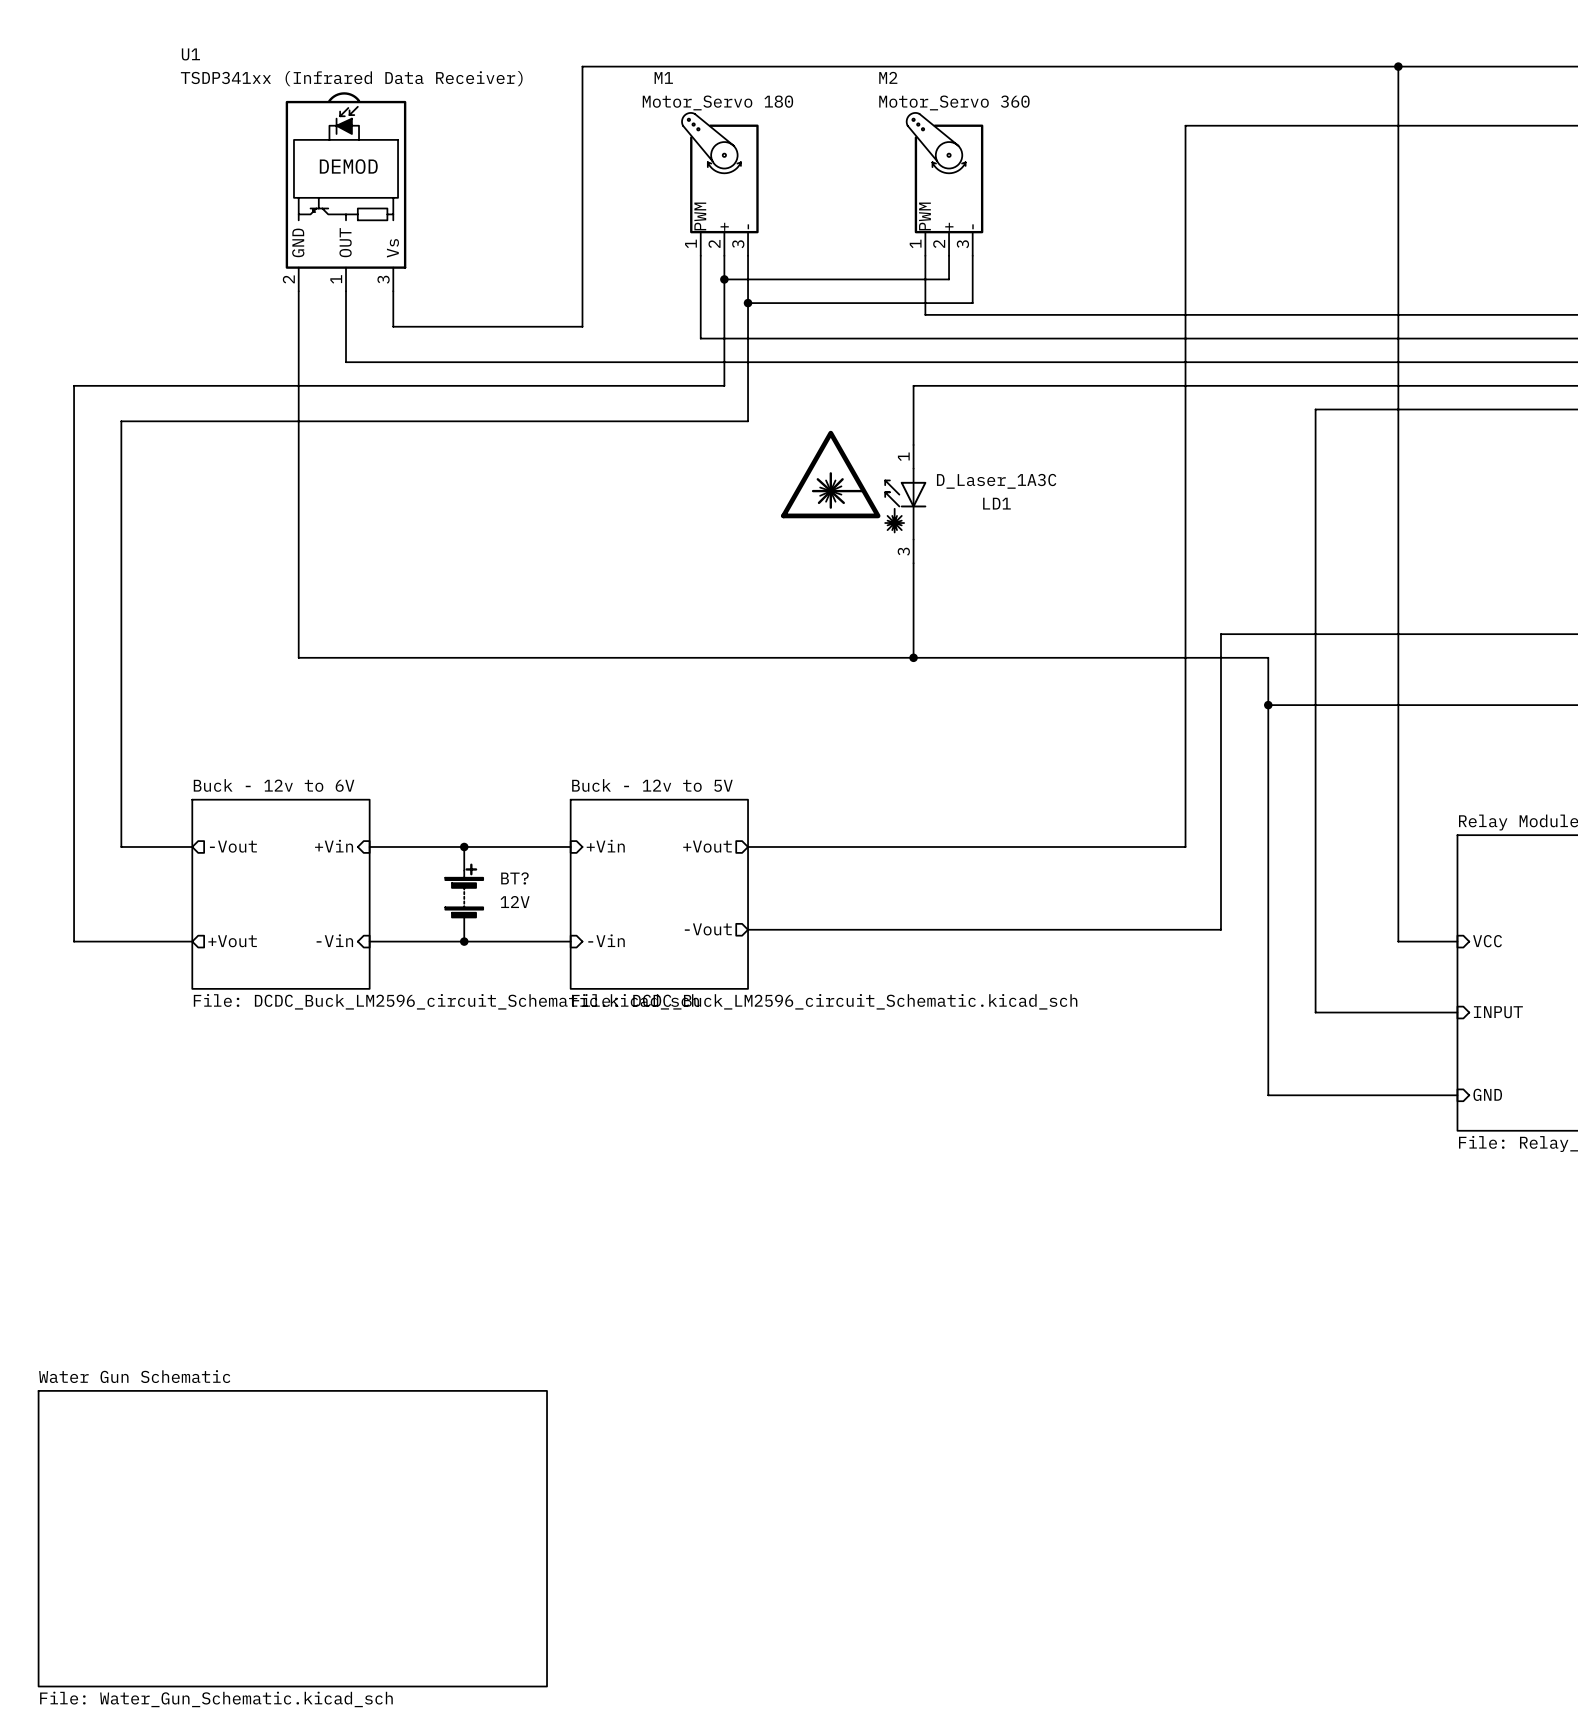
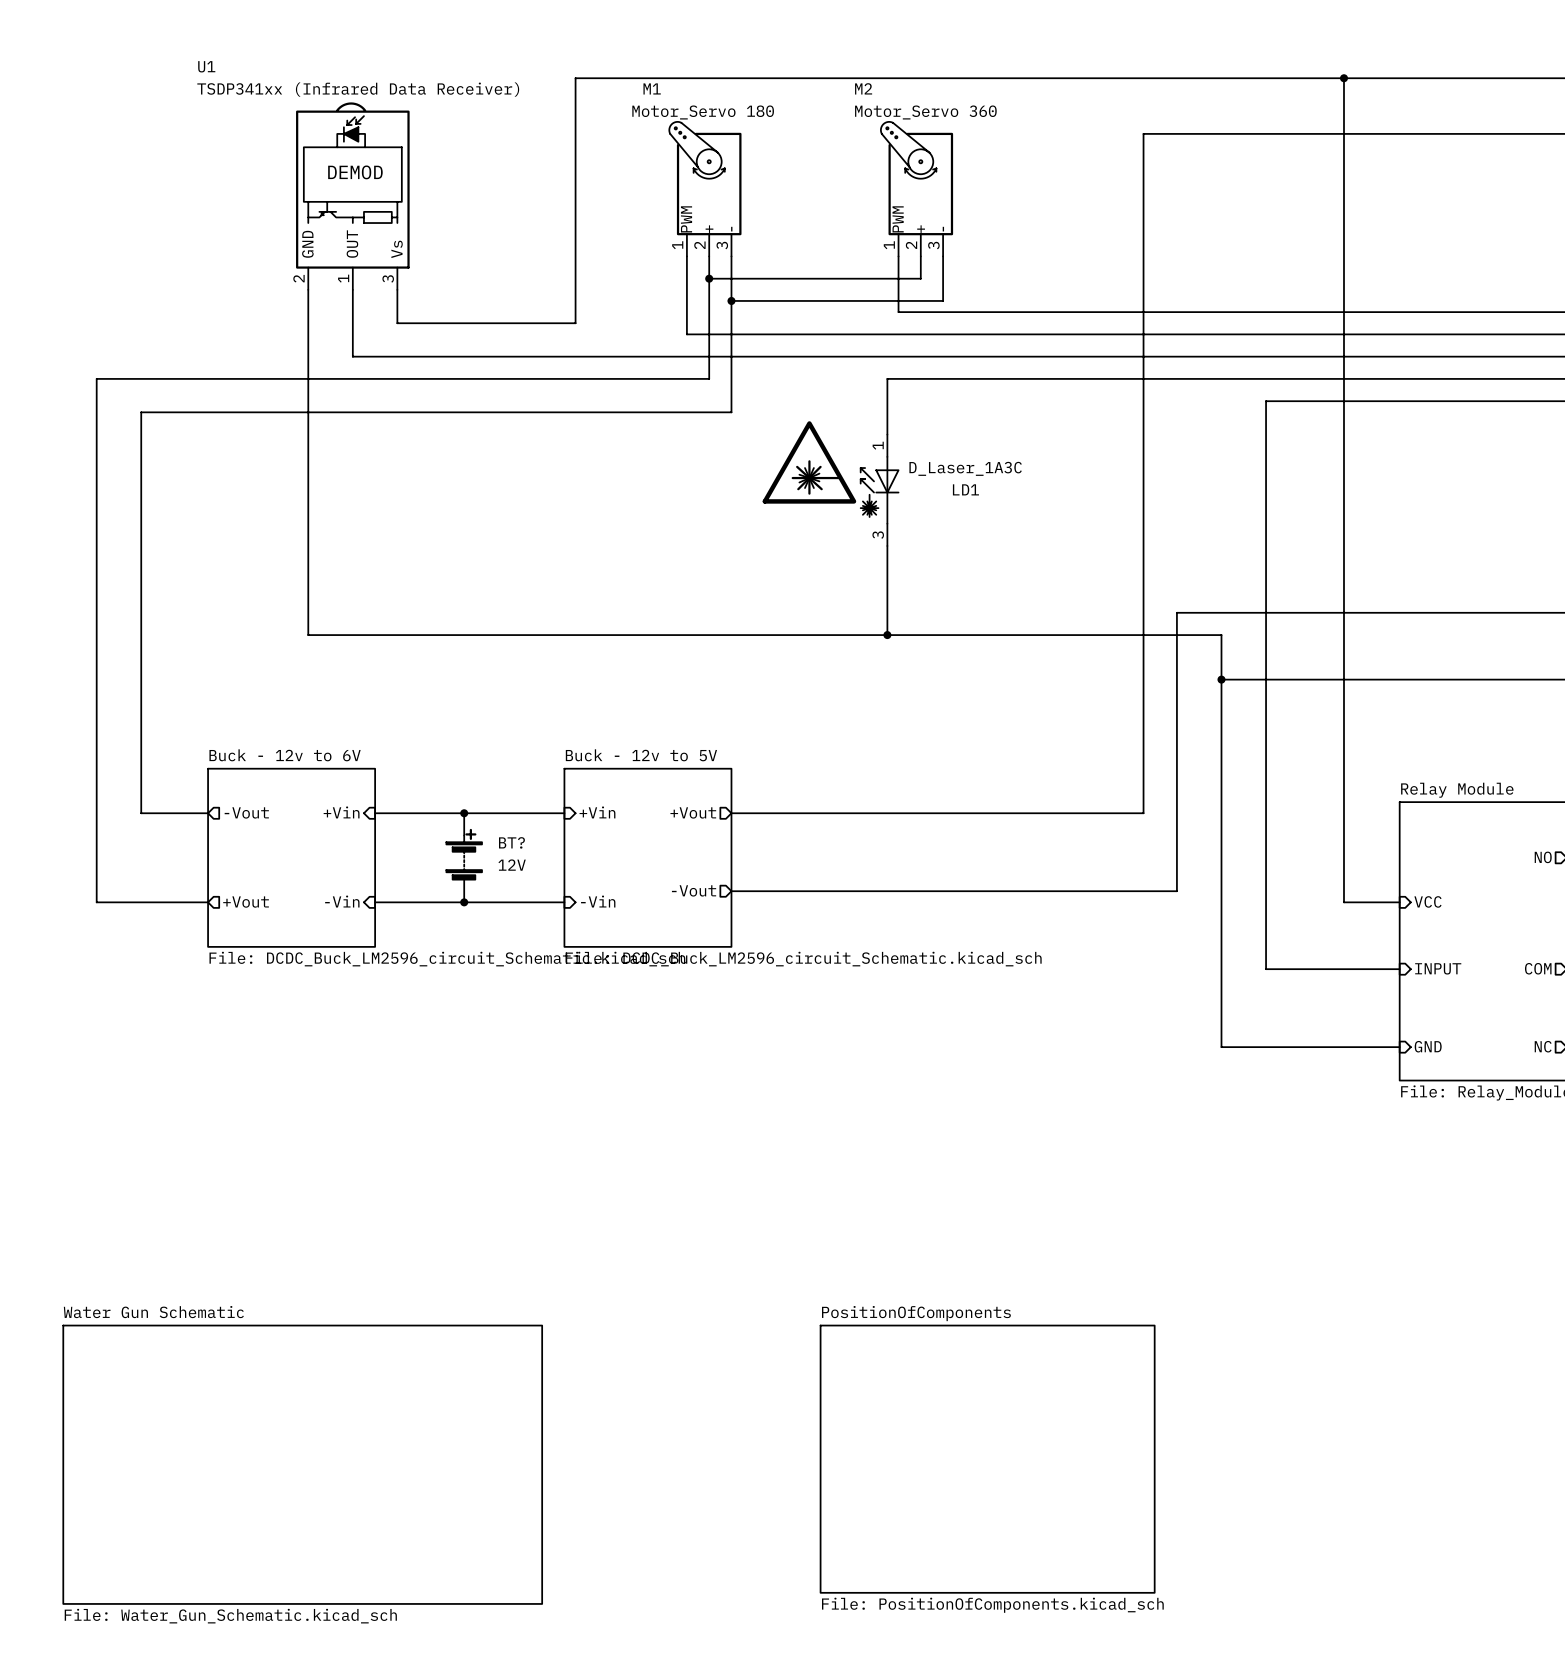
sheet PositionOfComponents: none -> File: PositionOfComponents.kicad_sch (987, 1459)

